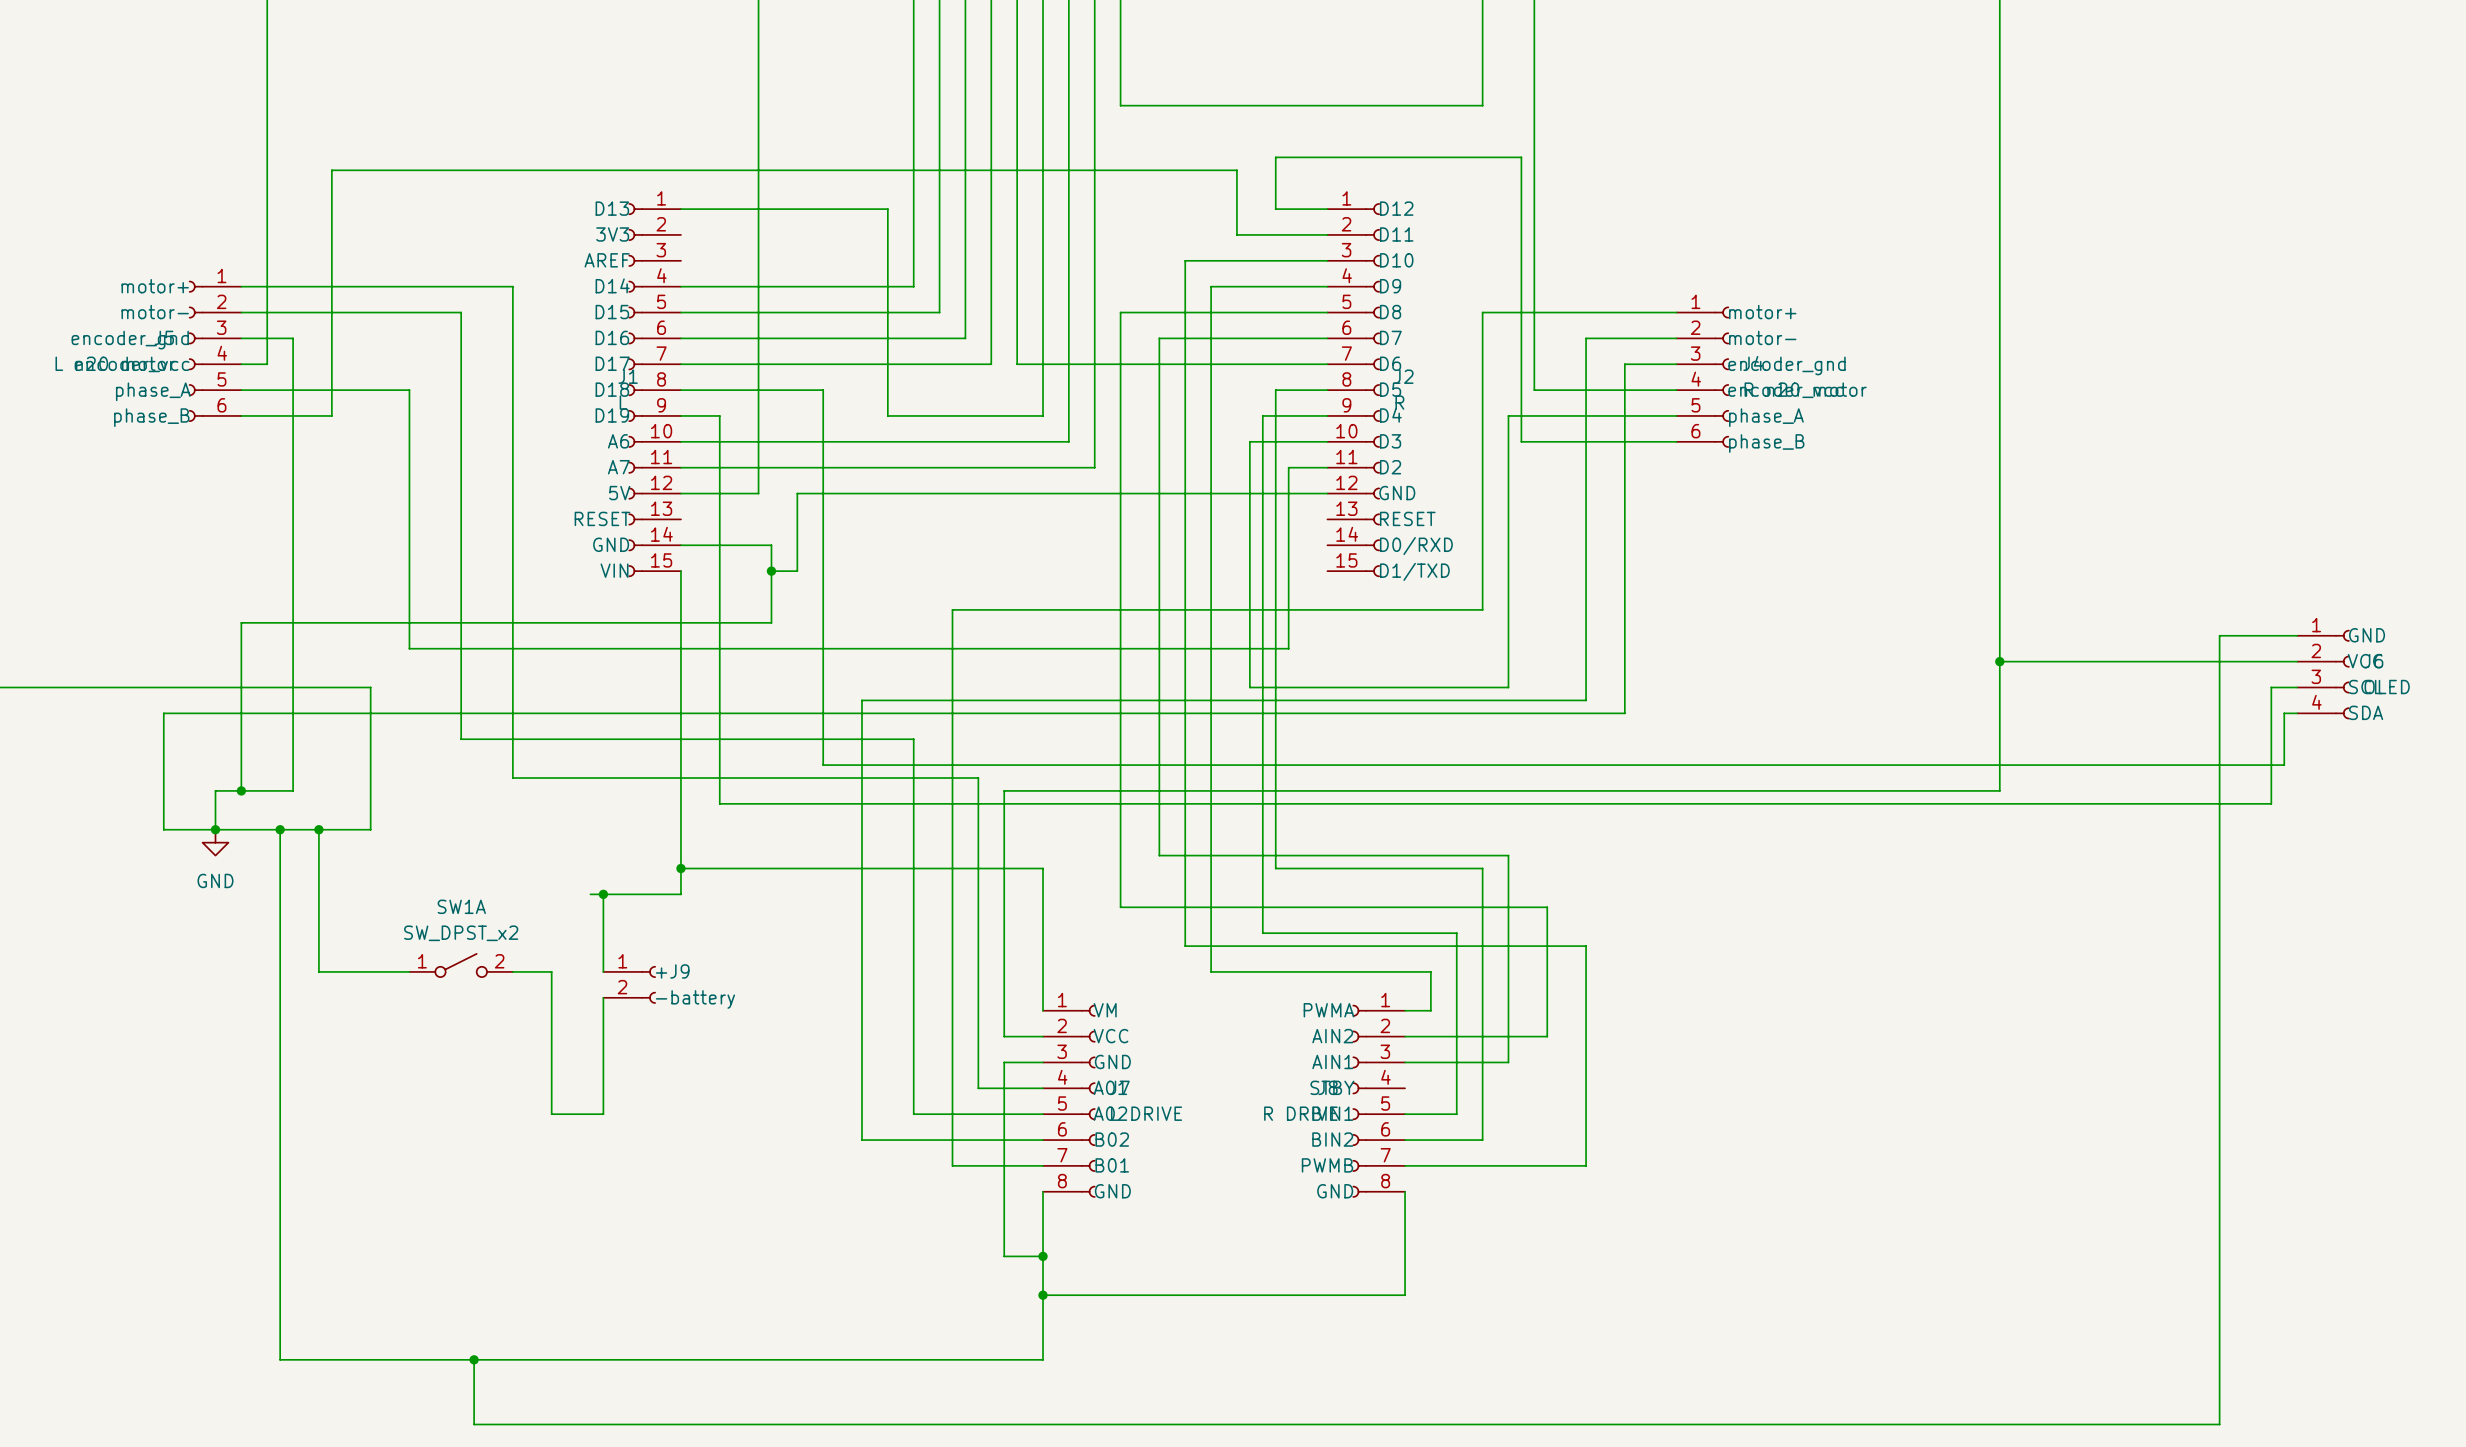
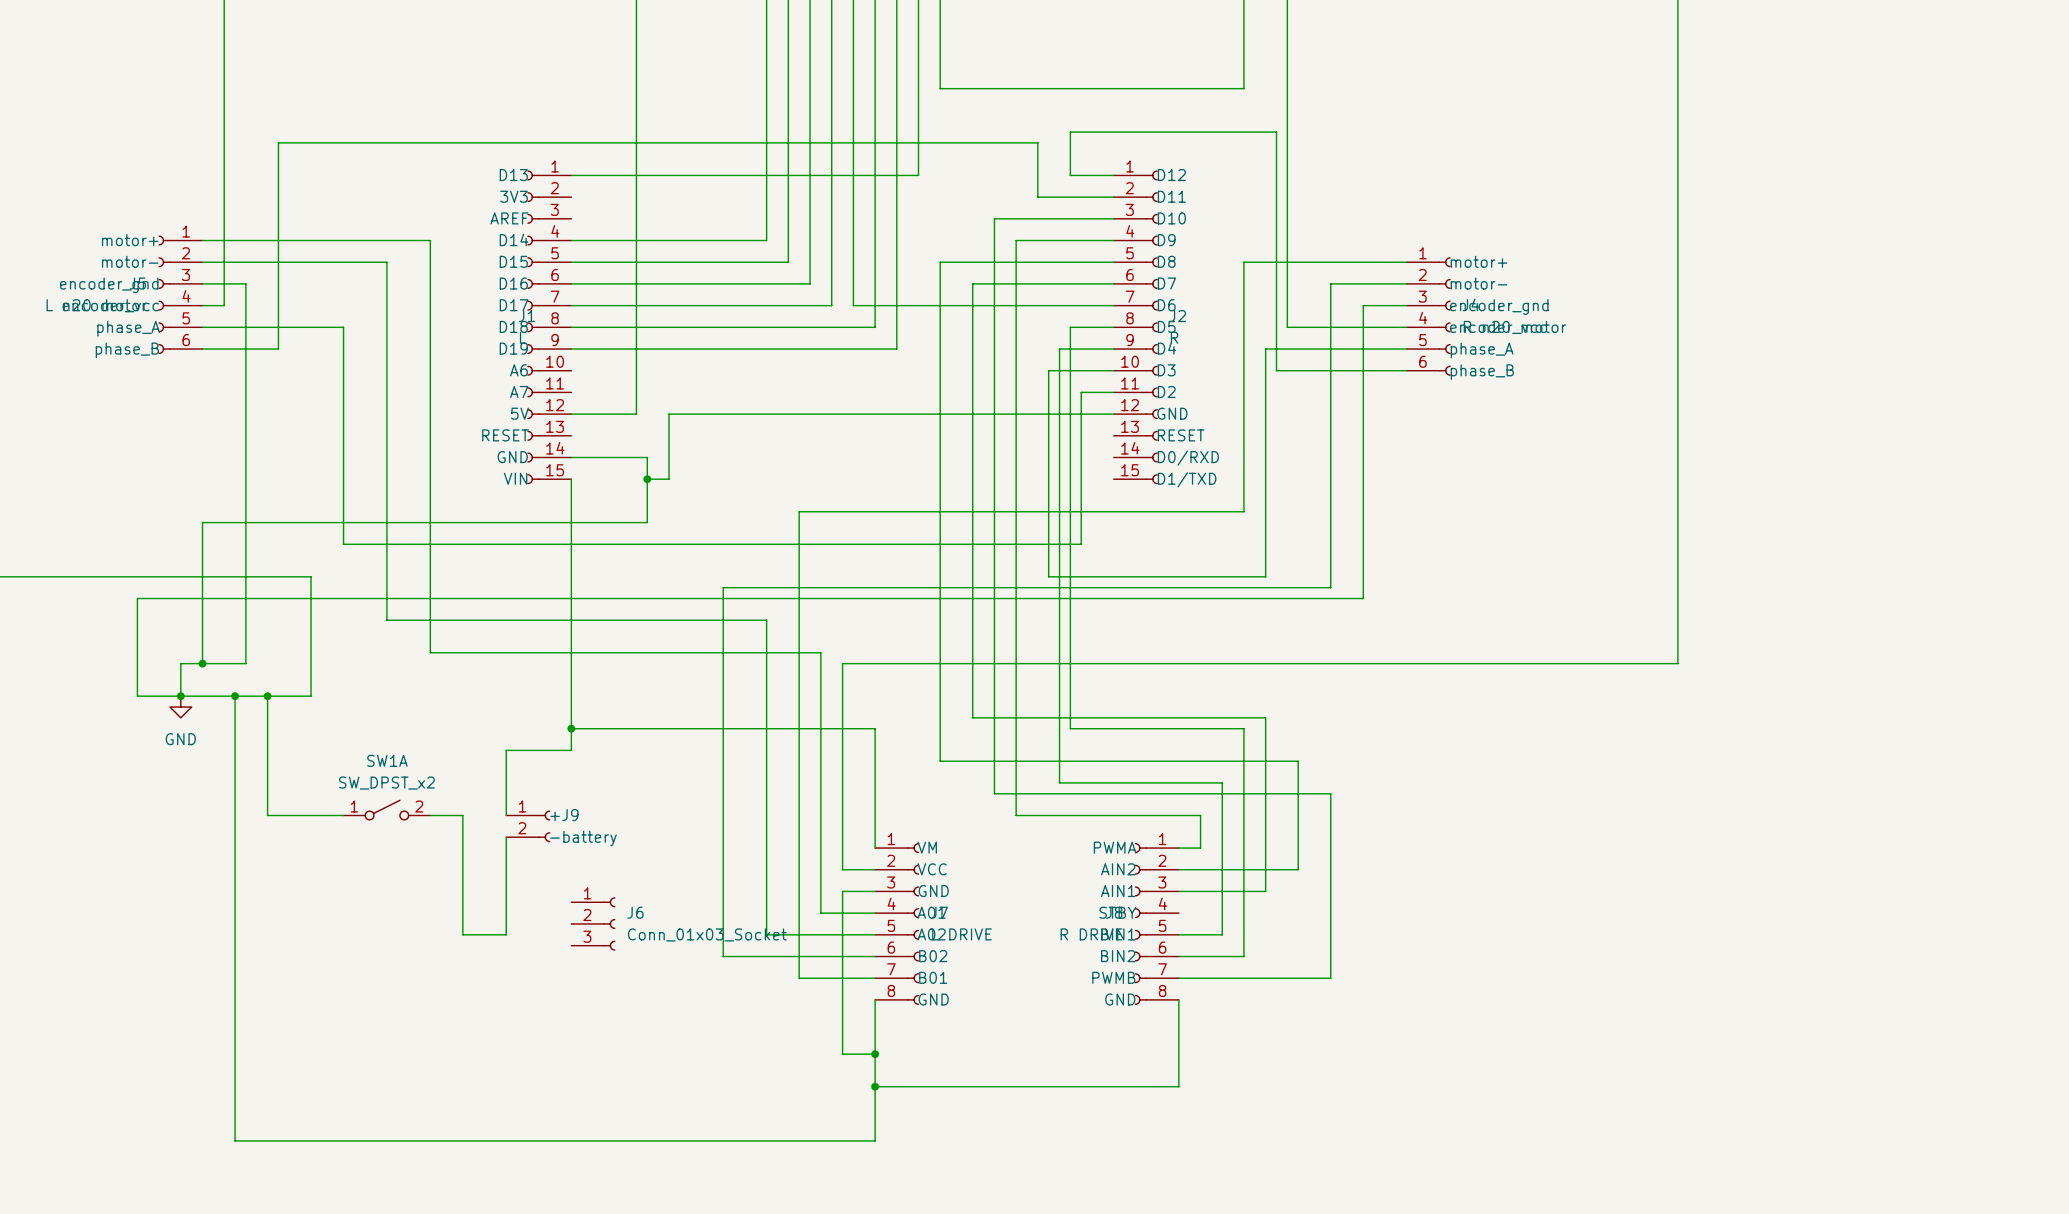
wire: (887, 209) (887, 415) -> (603, 349) (744, 349)
wire: (1094, 209) (1094, 467) (680, 467) -> (918, 175) (744, 175)
wire: (823, 390) (823, 765) (2284, 765) (2284, 713) (2297, 713) -> (690, 327) (875, 327)
wire: (1043, 390) (1043, 415) -> (896, 349) (875, 349)
wire: (719, 415) (719, 803) (2271, 803) (2271, 687) (2297, 687) -> none
wire: (1068, 415) (1068, 441) (680, 441) -> none
J6 symbol: [2297, 629, 2350, 720] -> [571, 897, 616, 951]
wire: (2297, 635) (2219, 635) (2219, 1424) (474, 1424) (474, 1359) -> none
wire: (1999, 661) (2297, 661) -> none
junction: (1999, 661) -> none
J6 value: OLED (2387, 687) -> Conn_01x03_Socket (707, 934)
wire: (590, 894) (603, 894) -> none
junction: (603, 894) -> none
junction: (474, 1359) -> none

